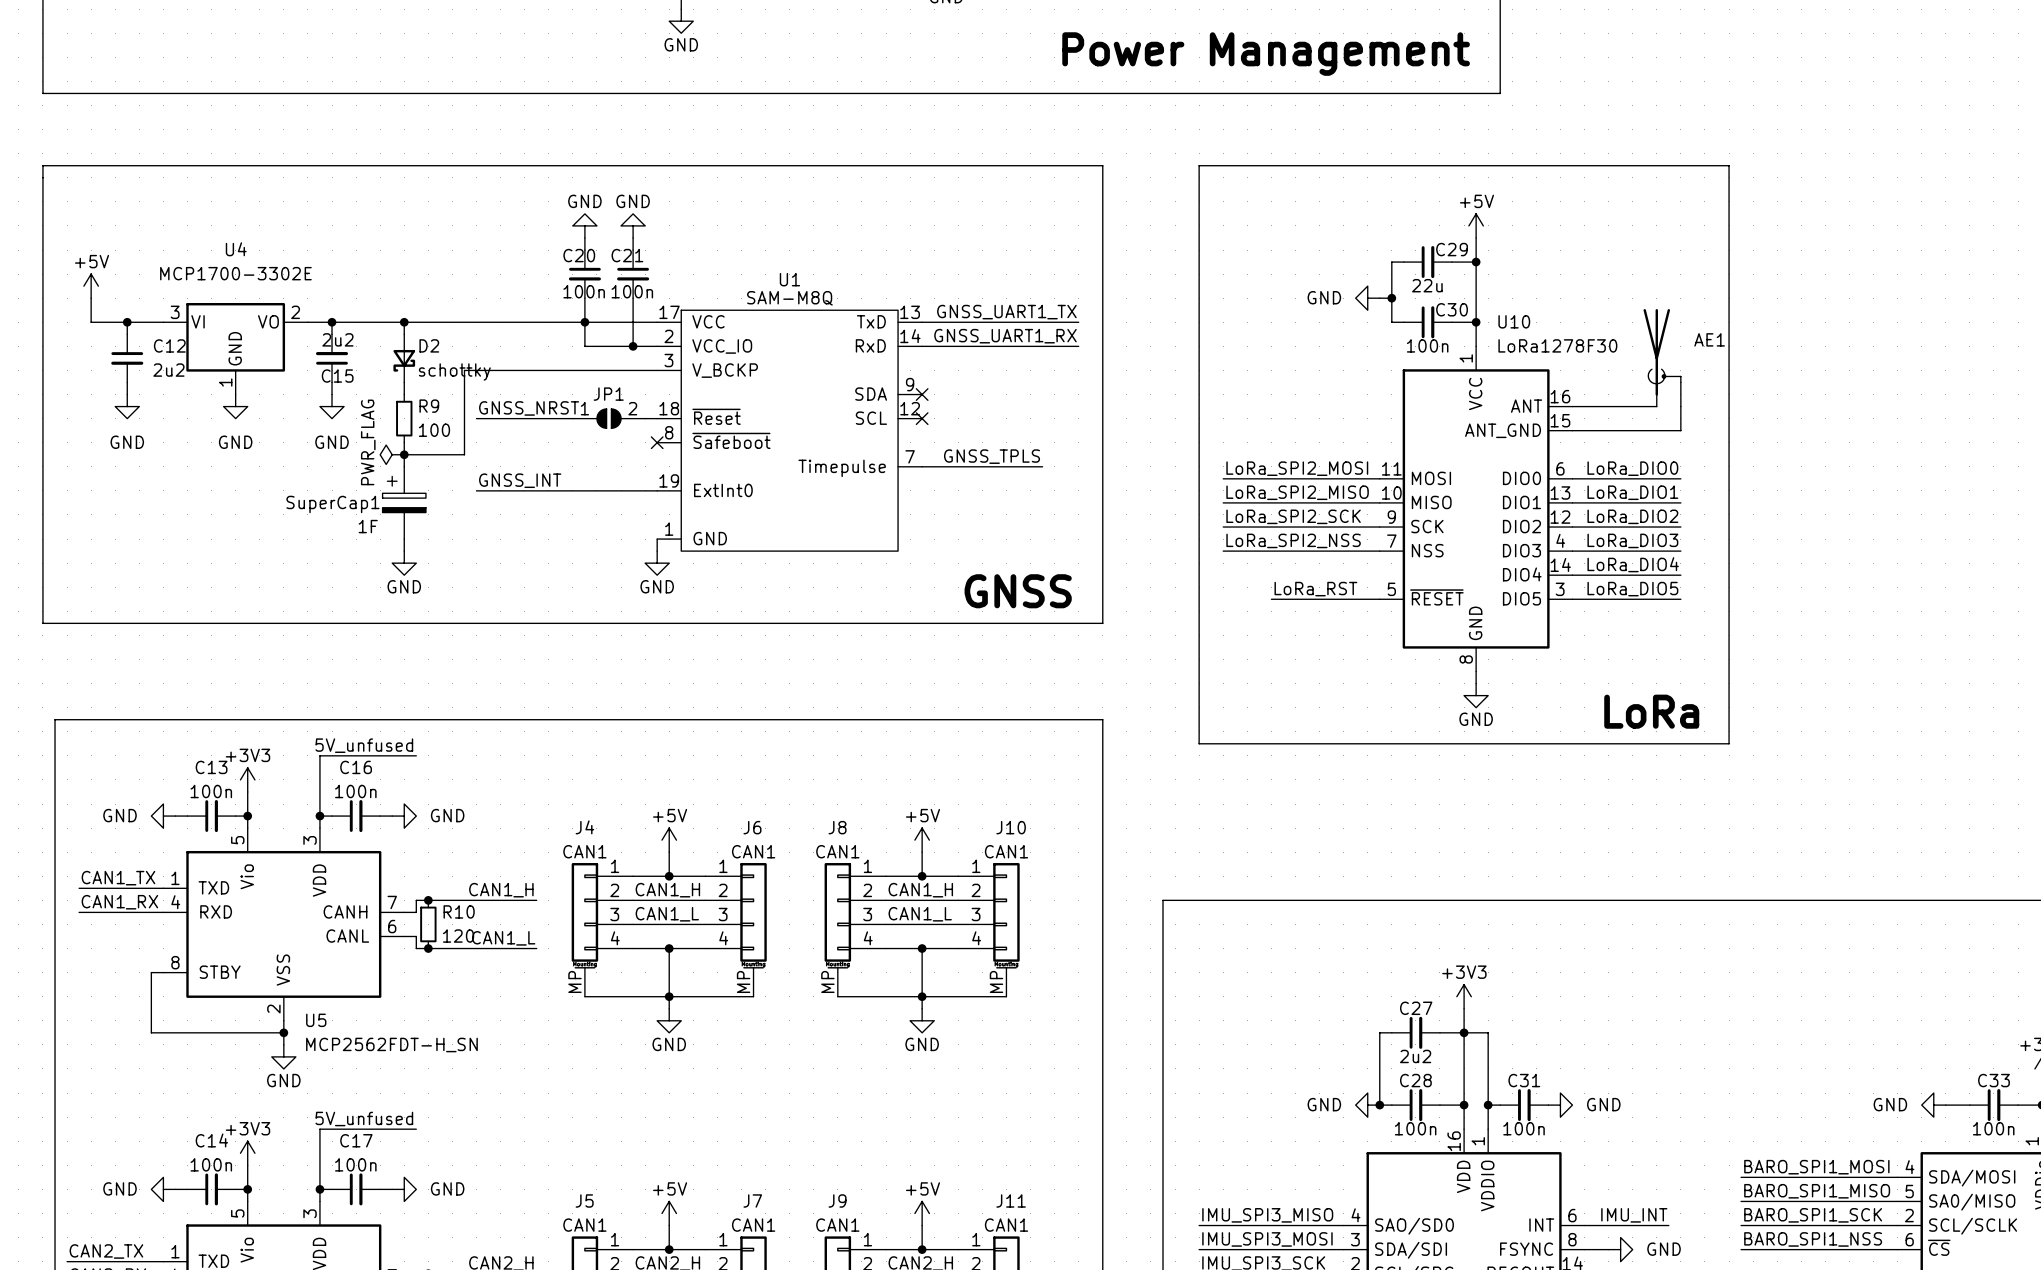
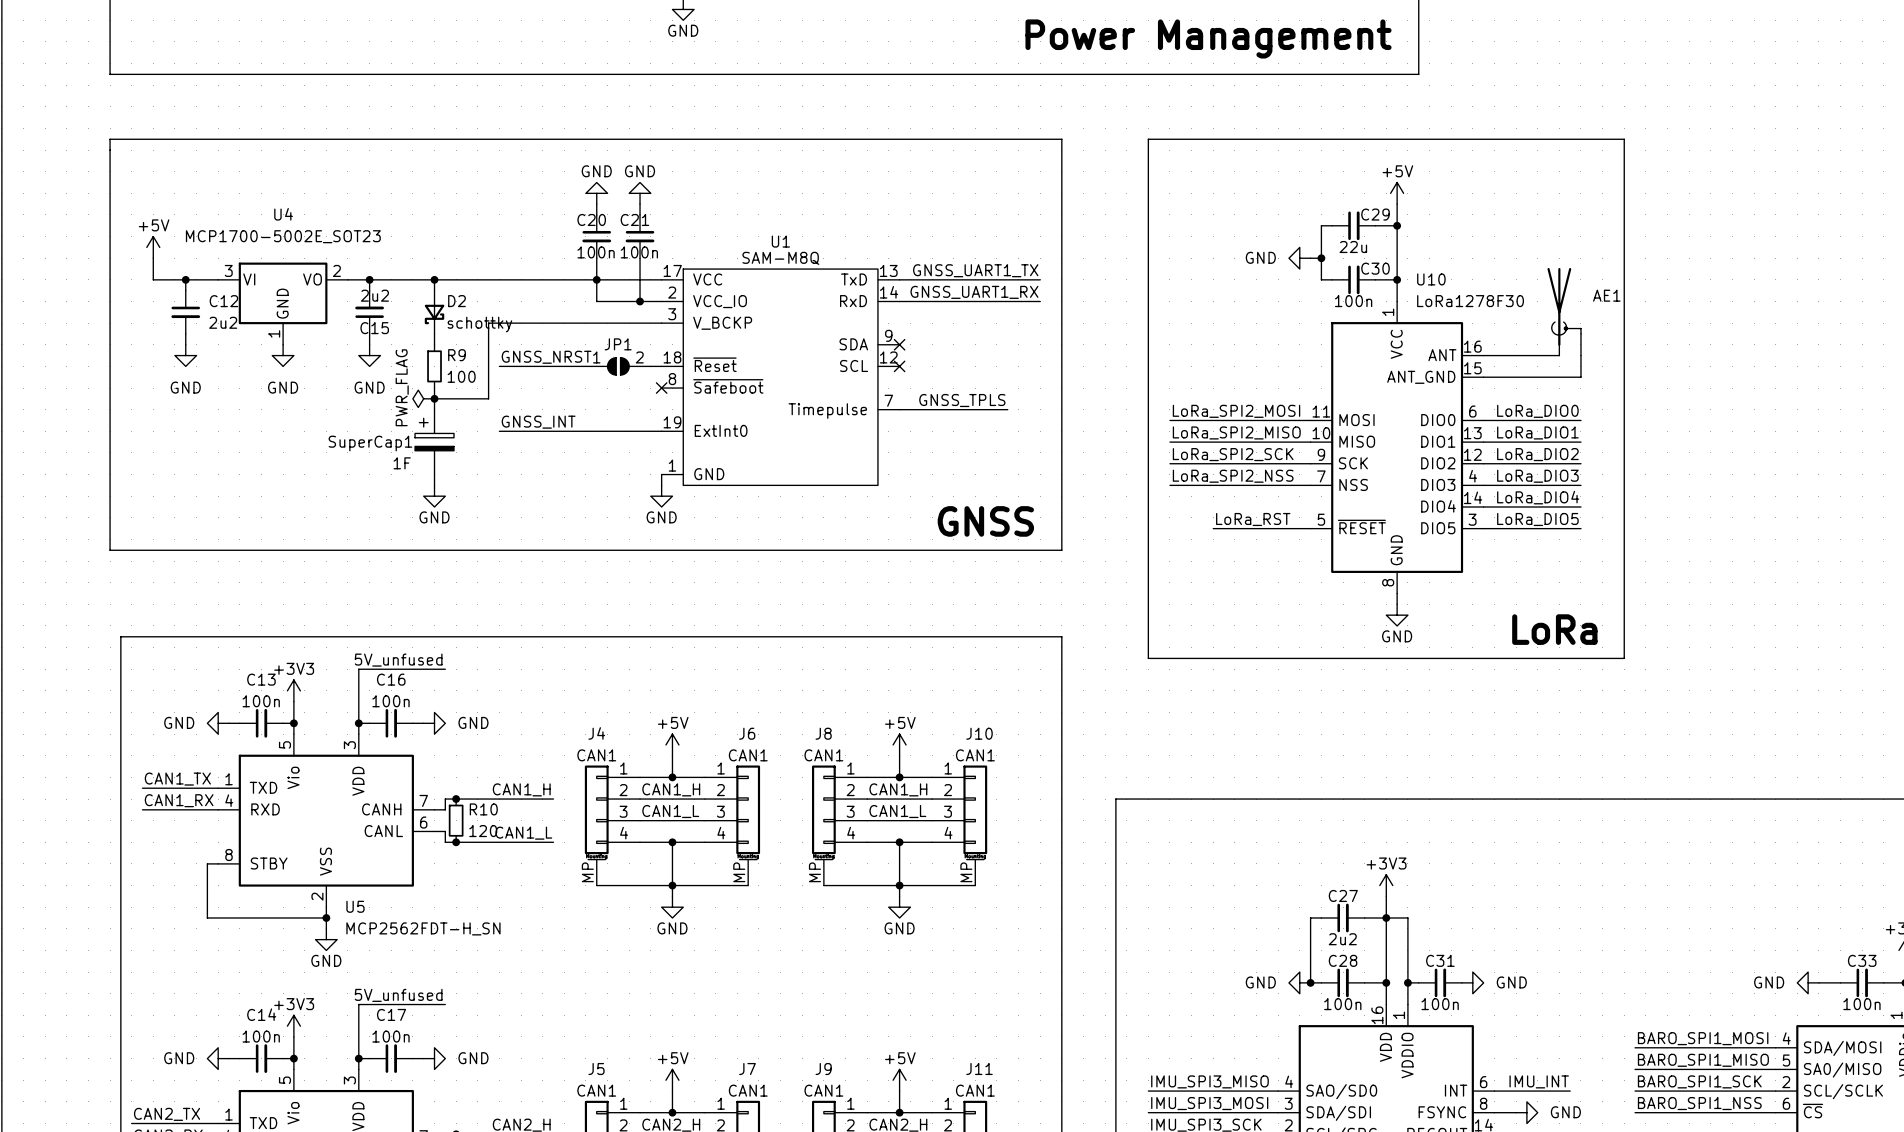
U4 value: MCP1700-3302E (235, 273) -> MCP1700-5002E_SOT23 (283, 236)

